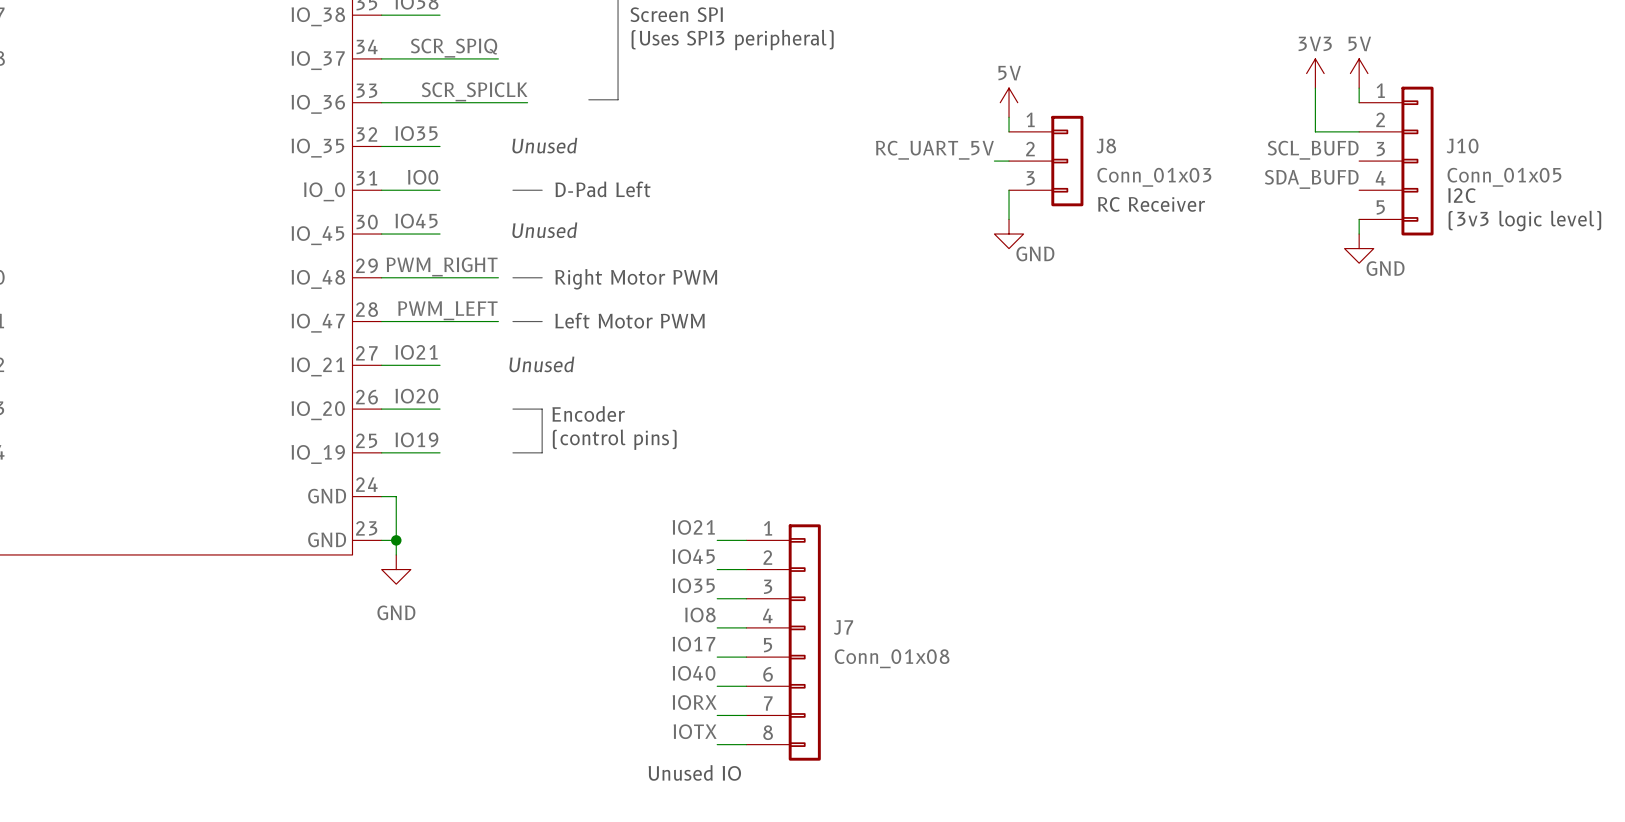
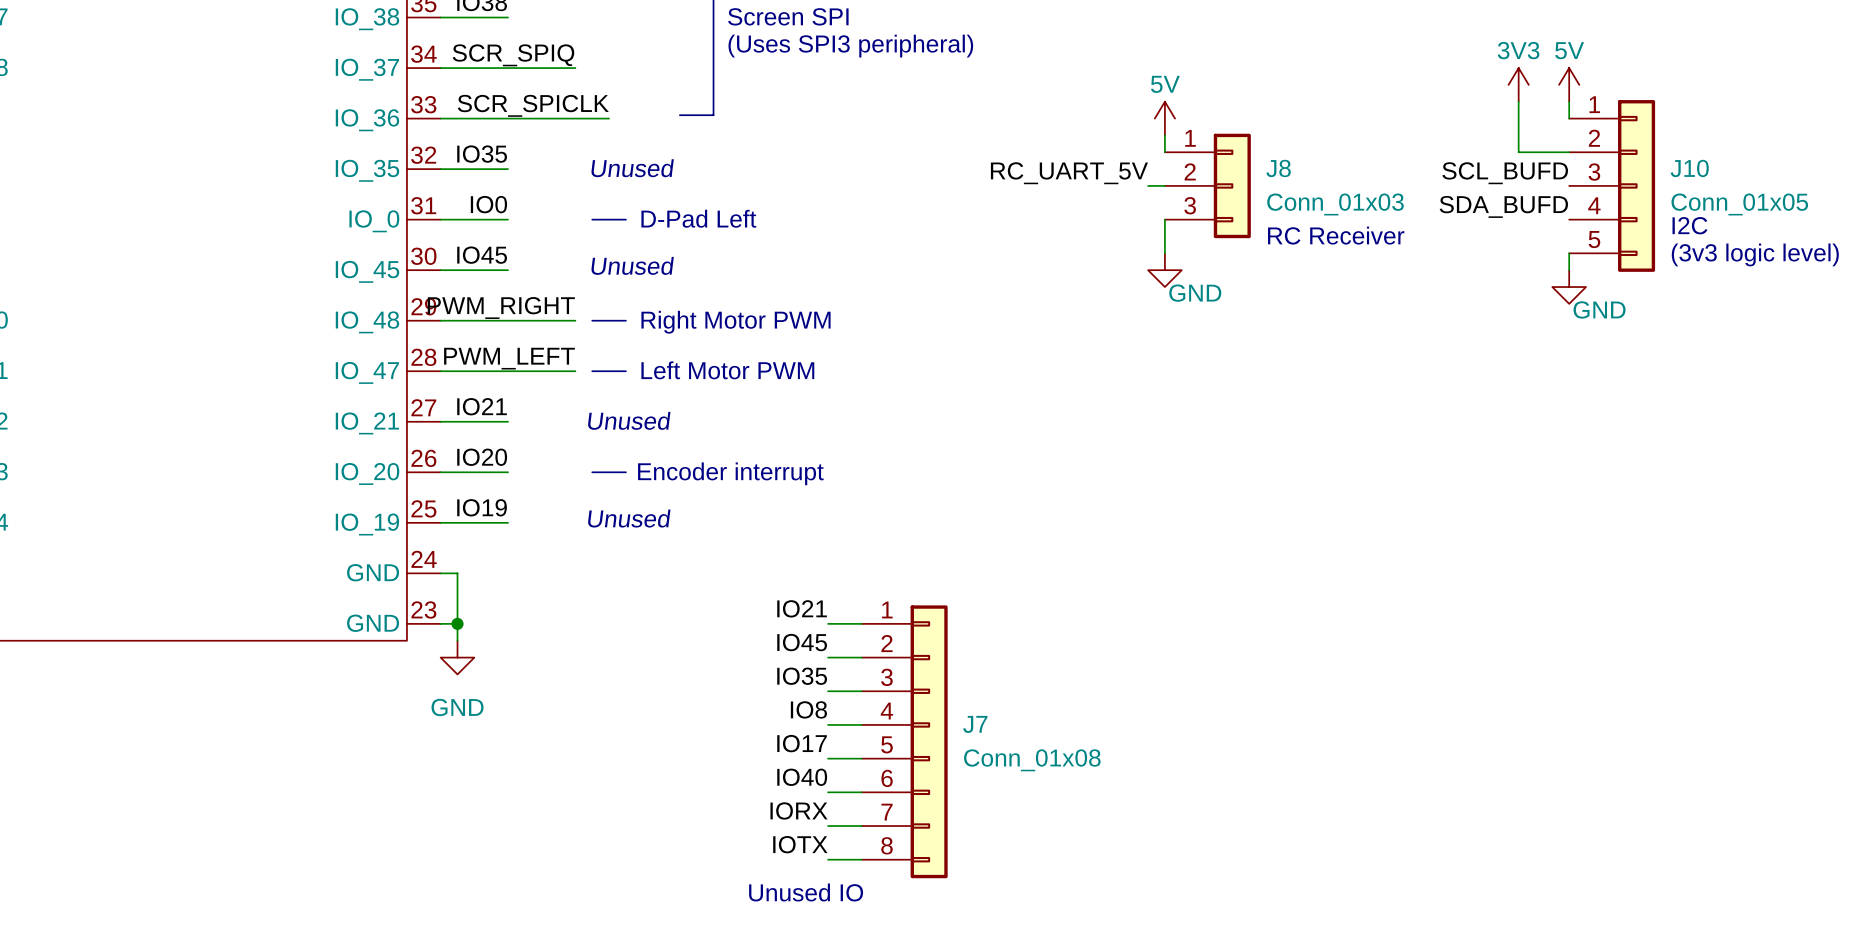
line: (542, 409) (542, 452) (512, 452) -> none
text: Encoder (588, 413) -> Encoder interrupt (730, 473)
text: (control pins) (614, 439) -> none
text: none -> Unused (629, 518)

